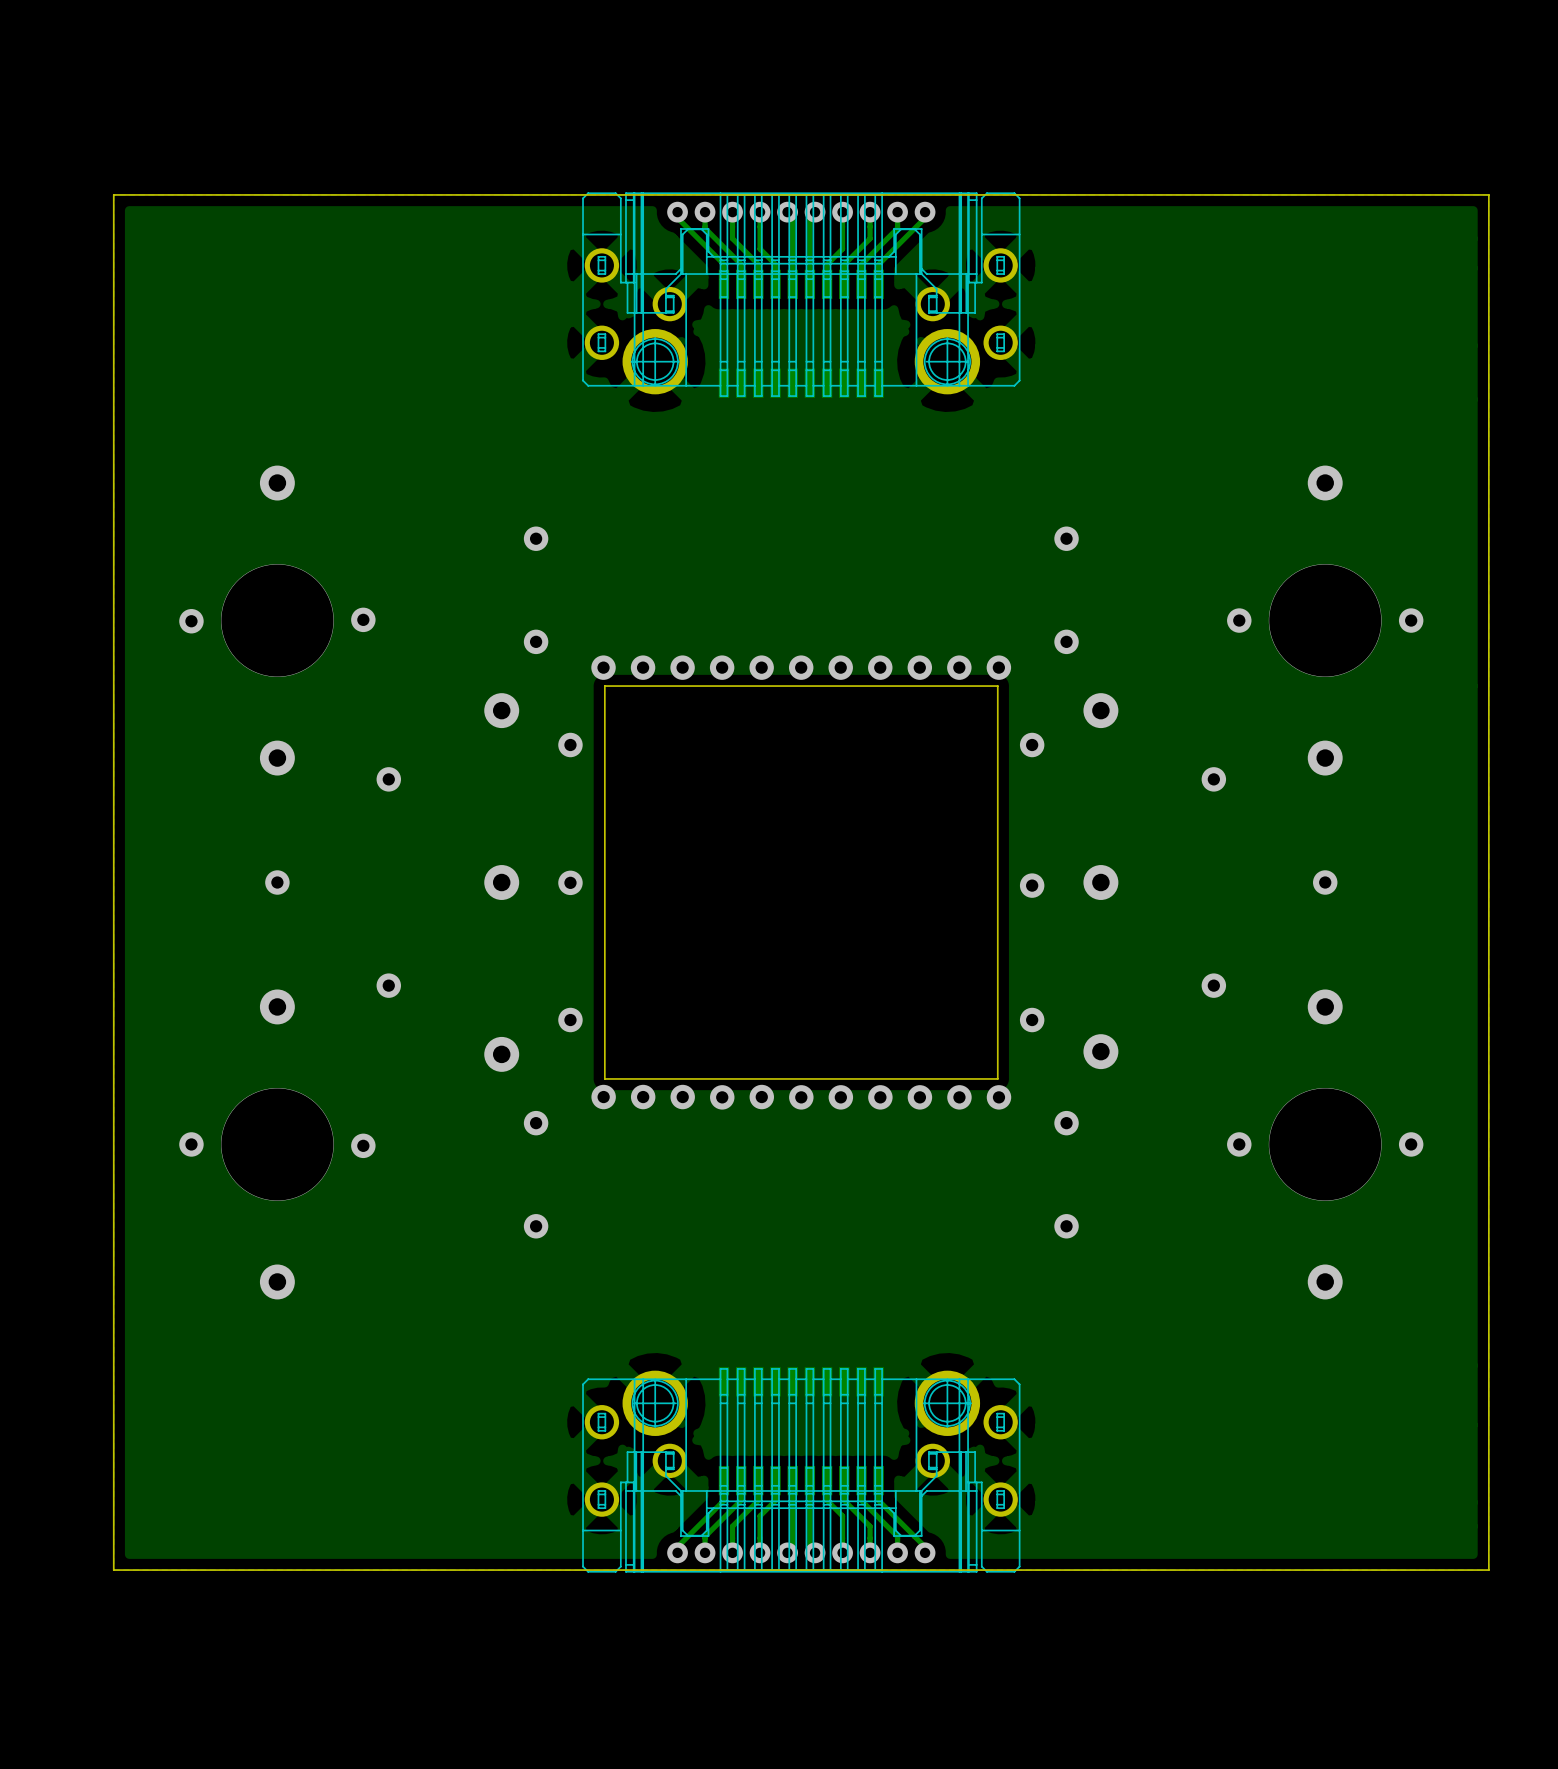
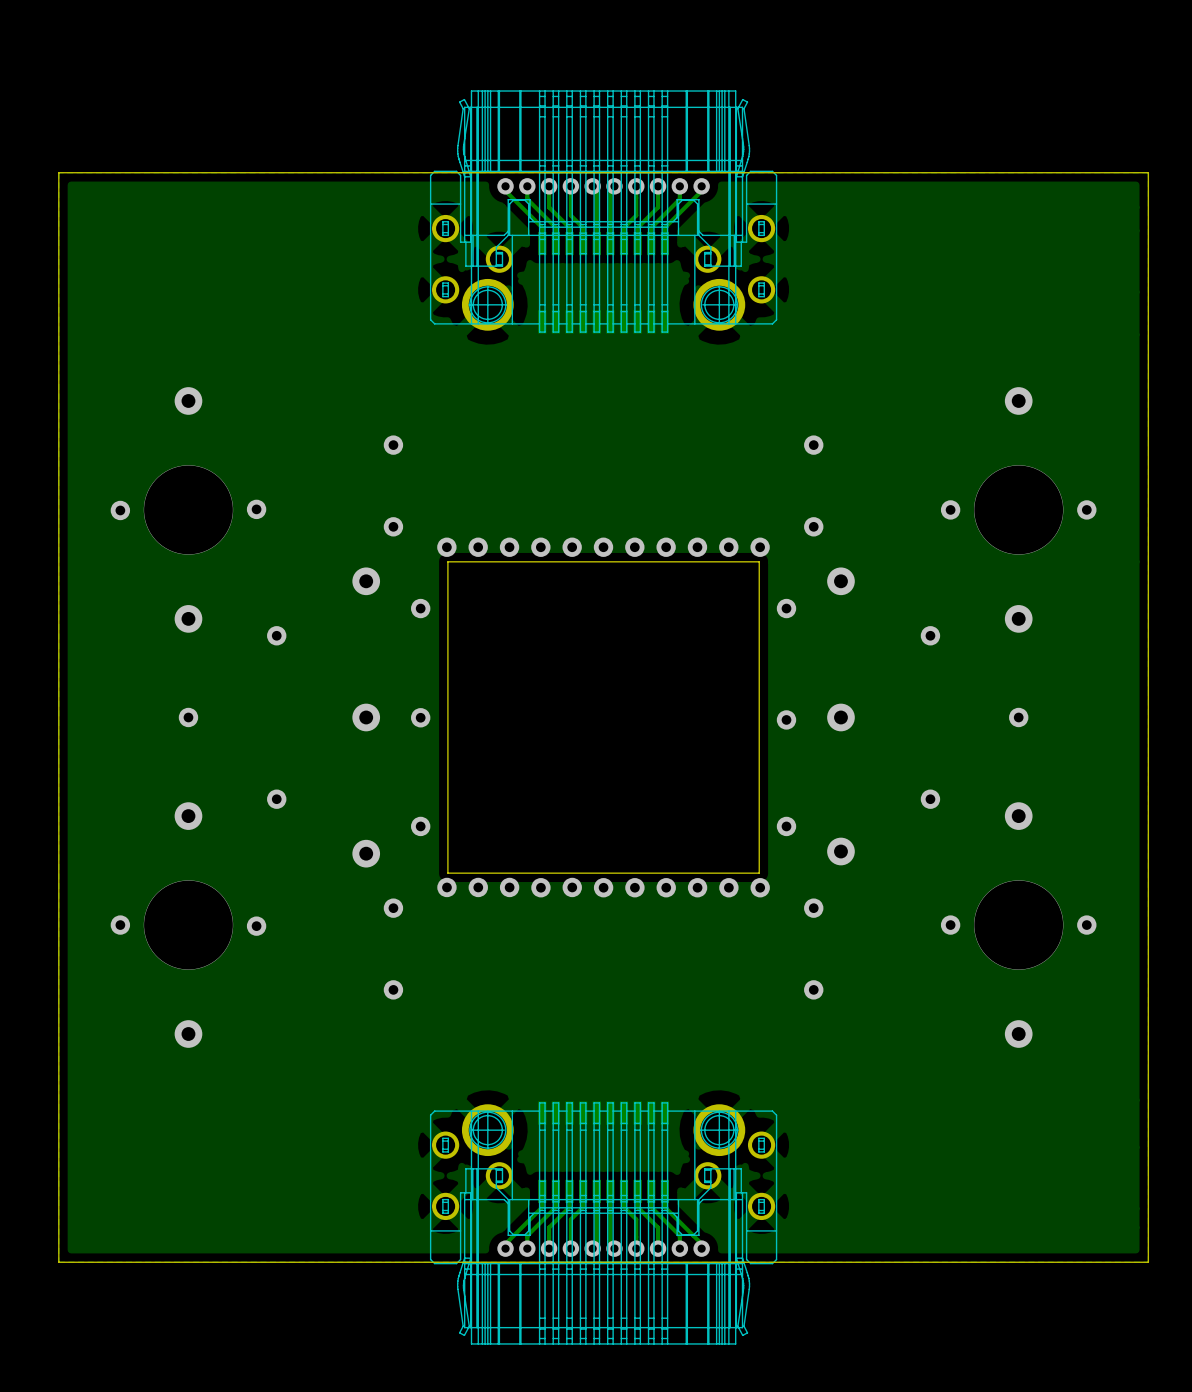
part: none -> (603, 211)
part: (801, 295) -> none
part: (801, 1469) -> none
part: none -> (603, 1223)

